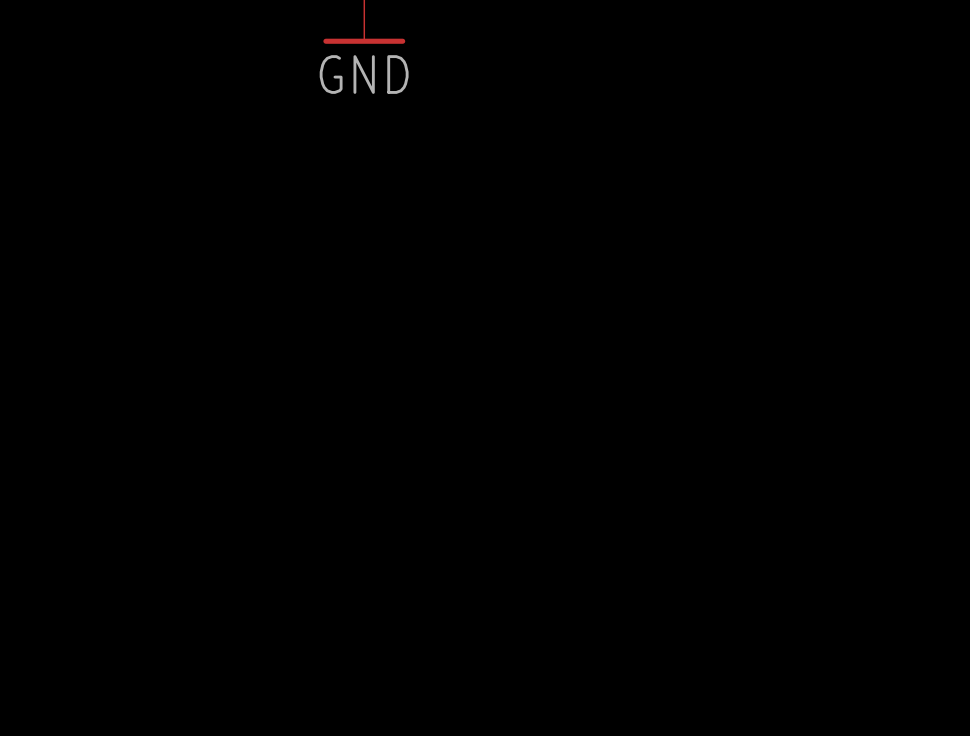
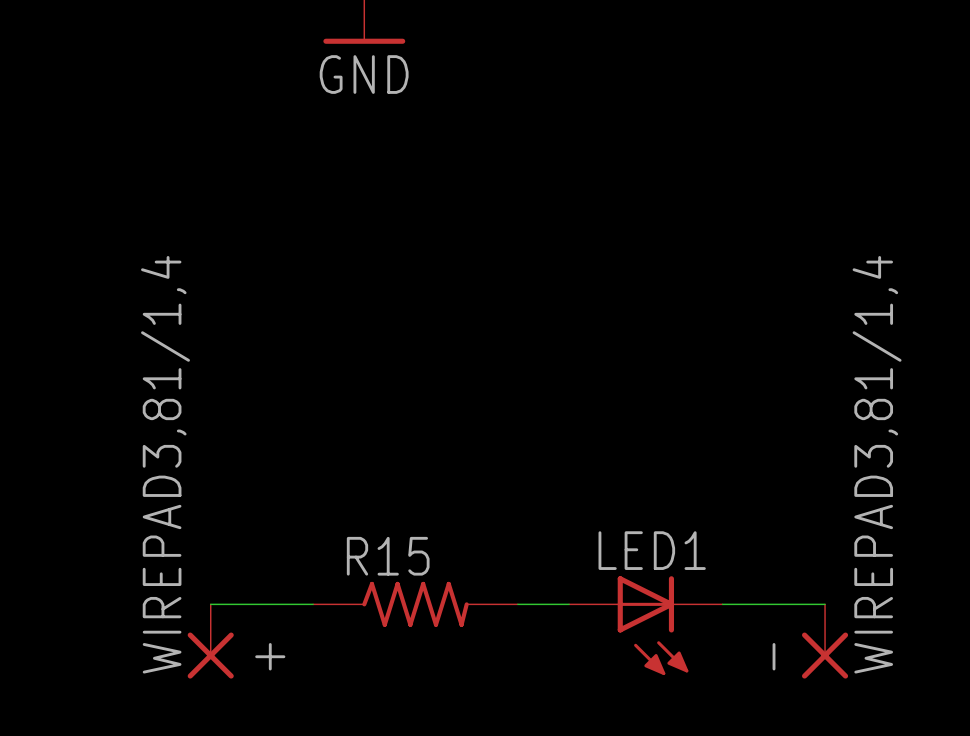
wire: none -> (210, 604) (313, 604)
R15: none -> (415, 604)
wire: none -> (517, 604) (569, 604)
wire: none -> (722, 604) (825, 604)
LED1: none -> (645, 625)
part: none -> WIREPAD3,81/1,4 (210, 641)
part: none -> WIREPAD3,81/1,4 (825, 641)

